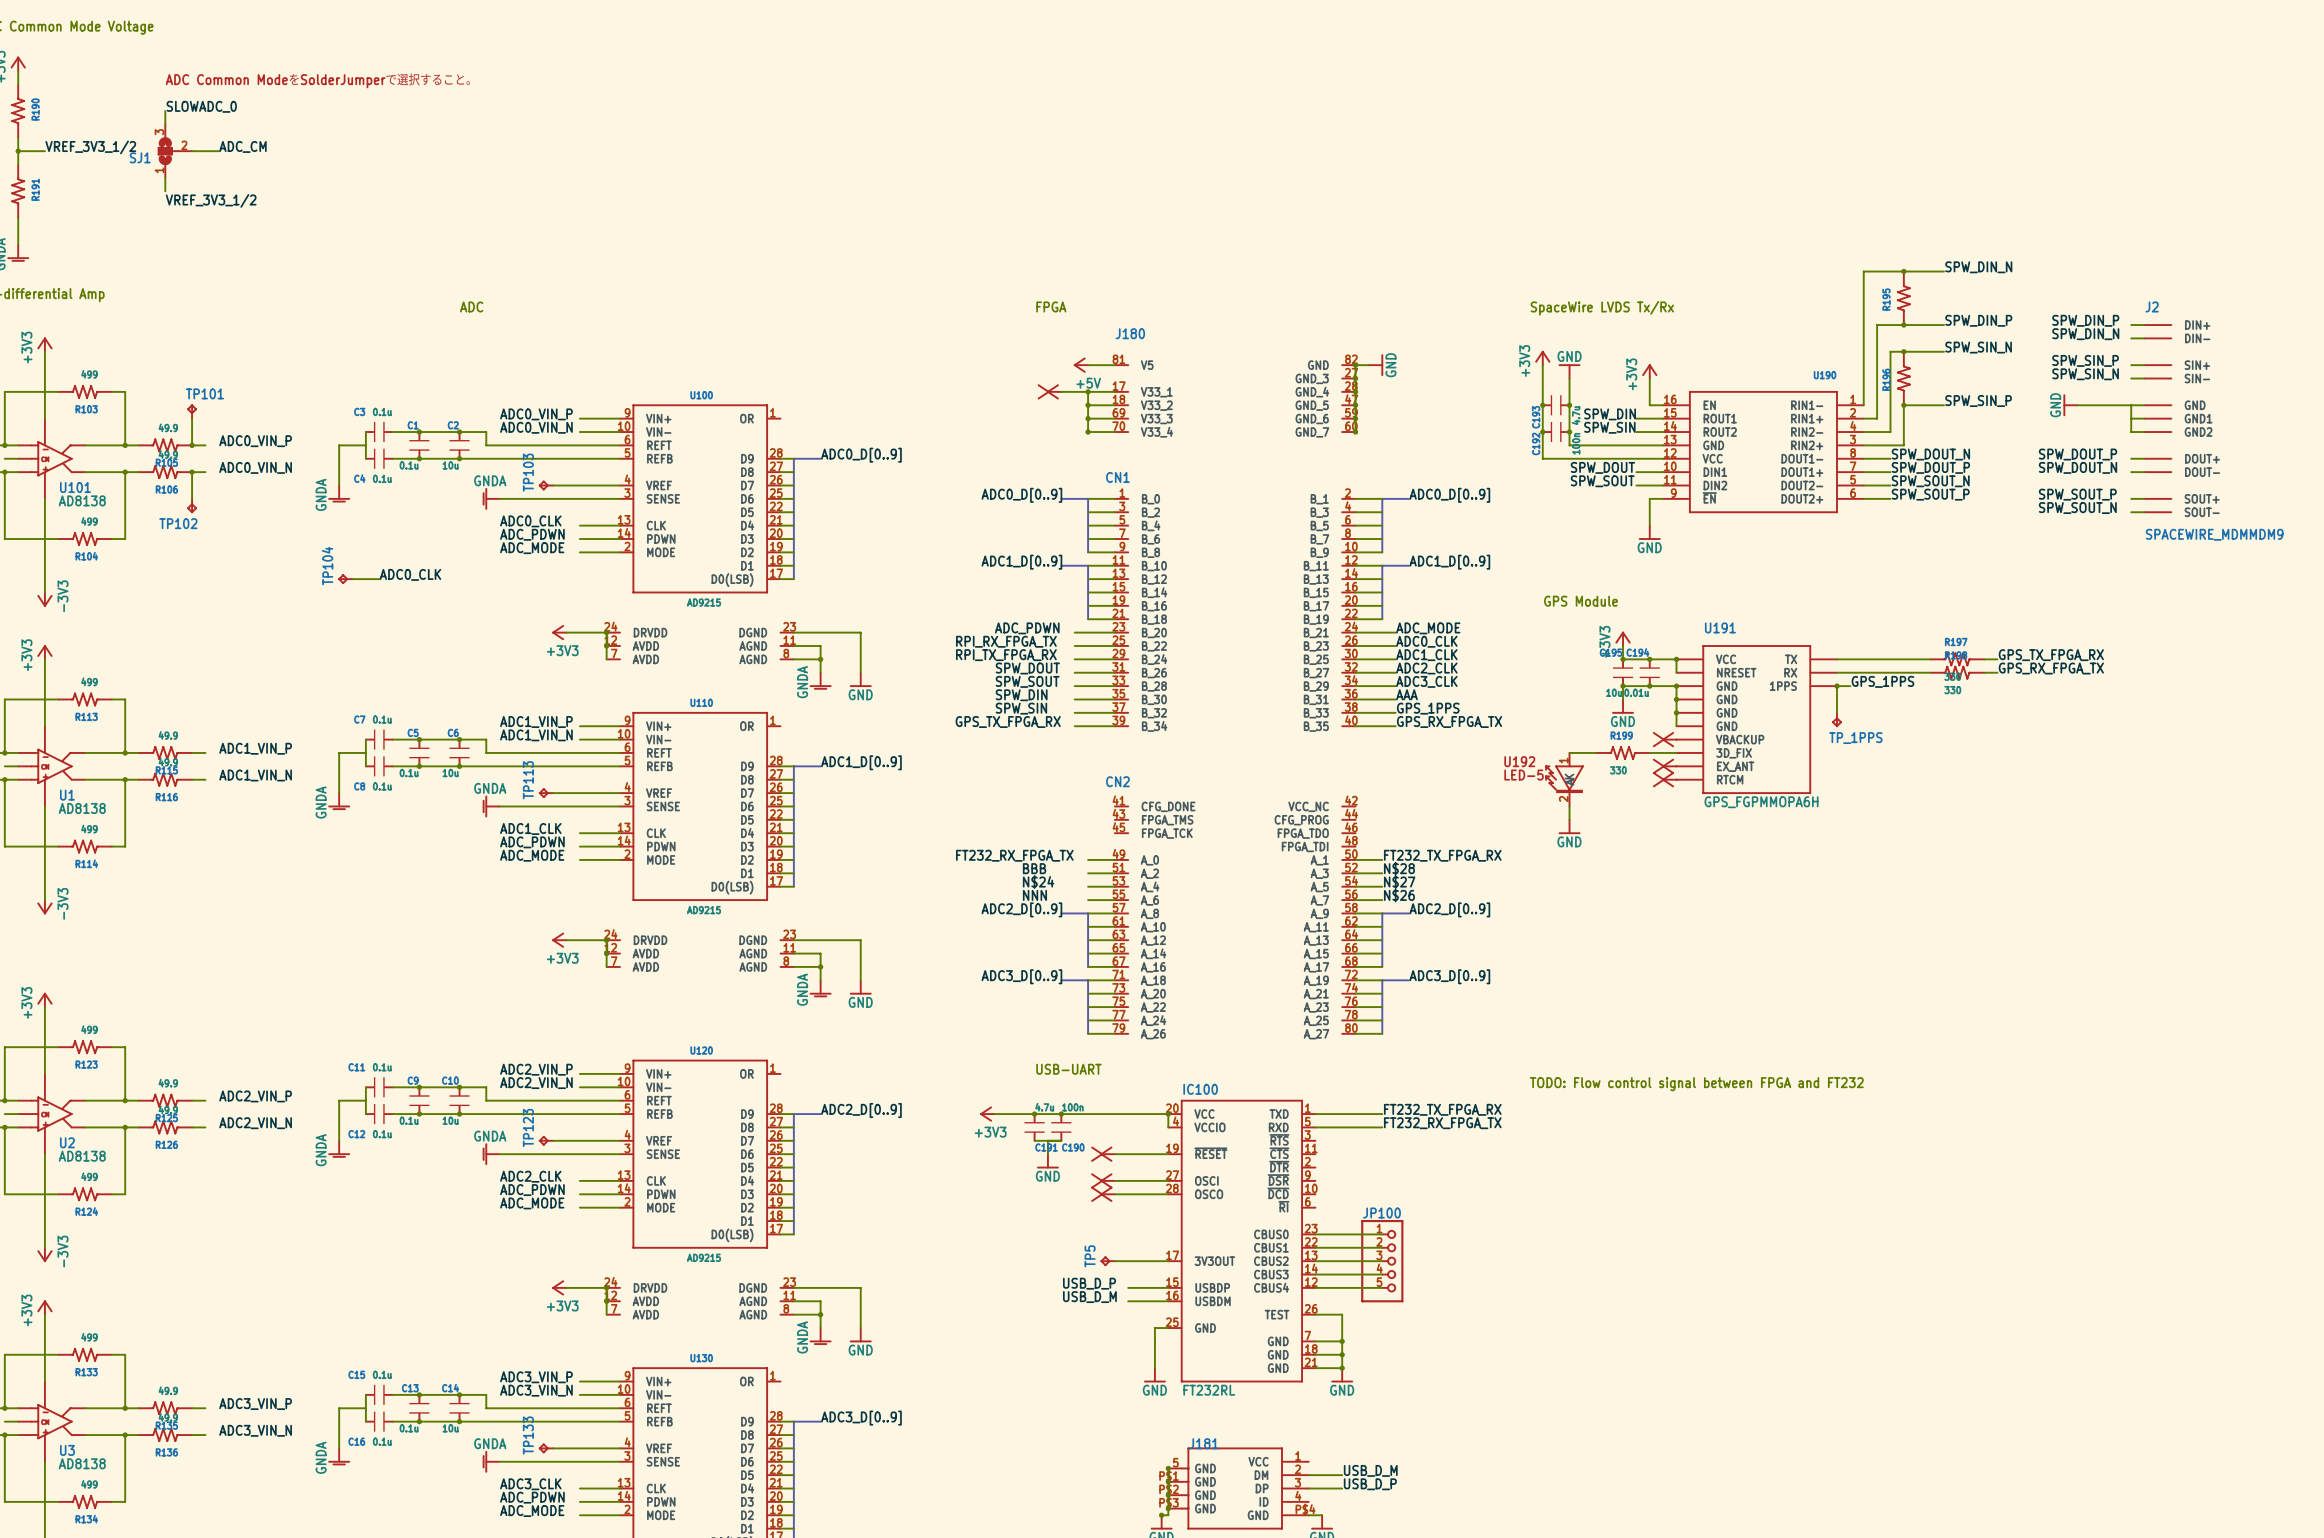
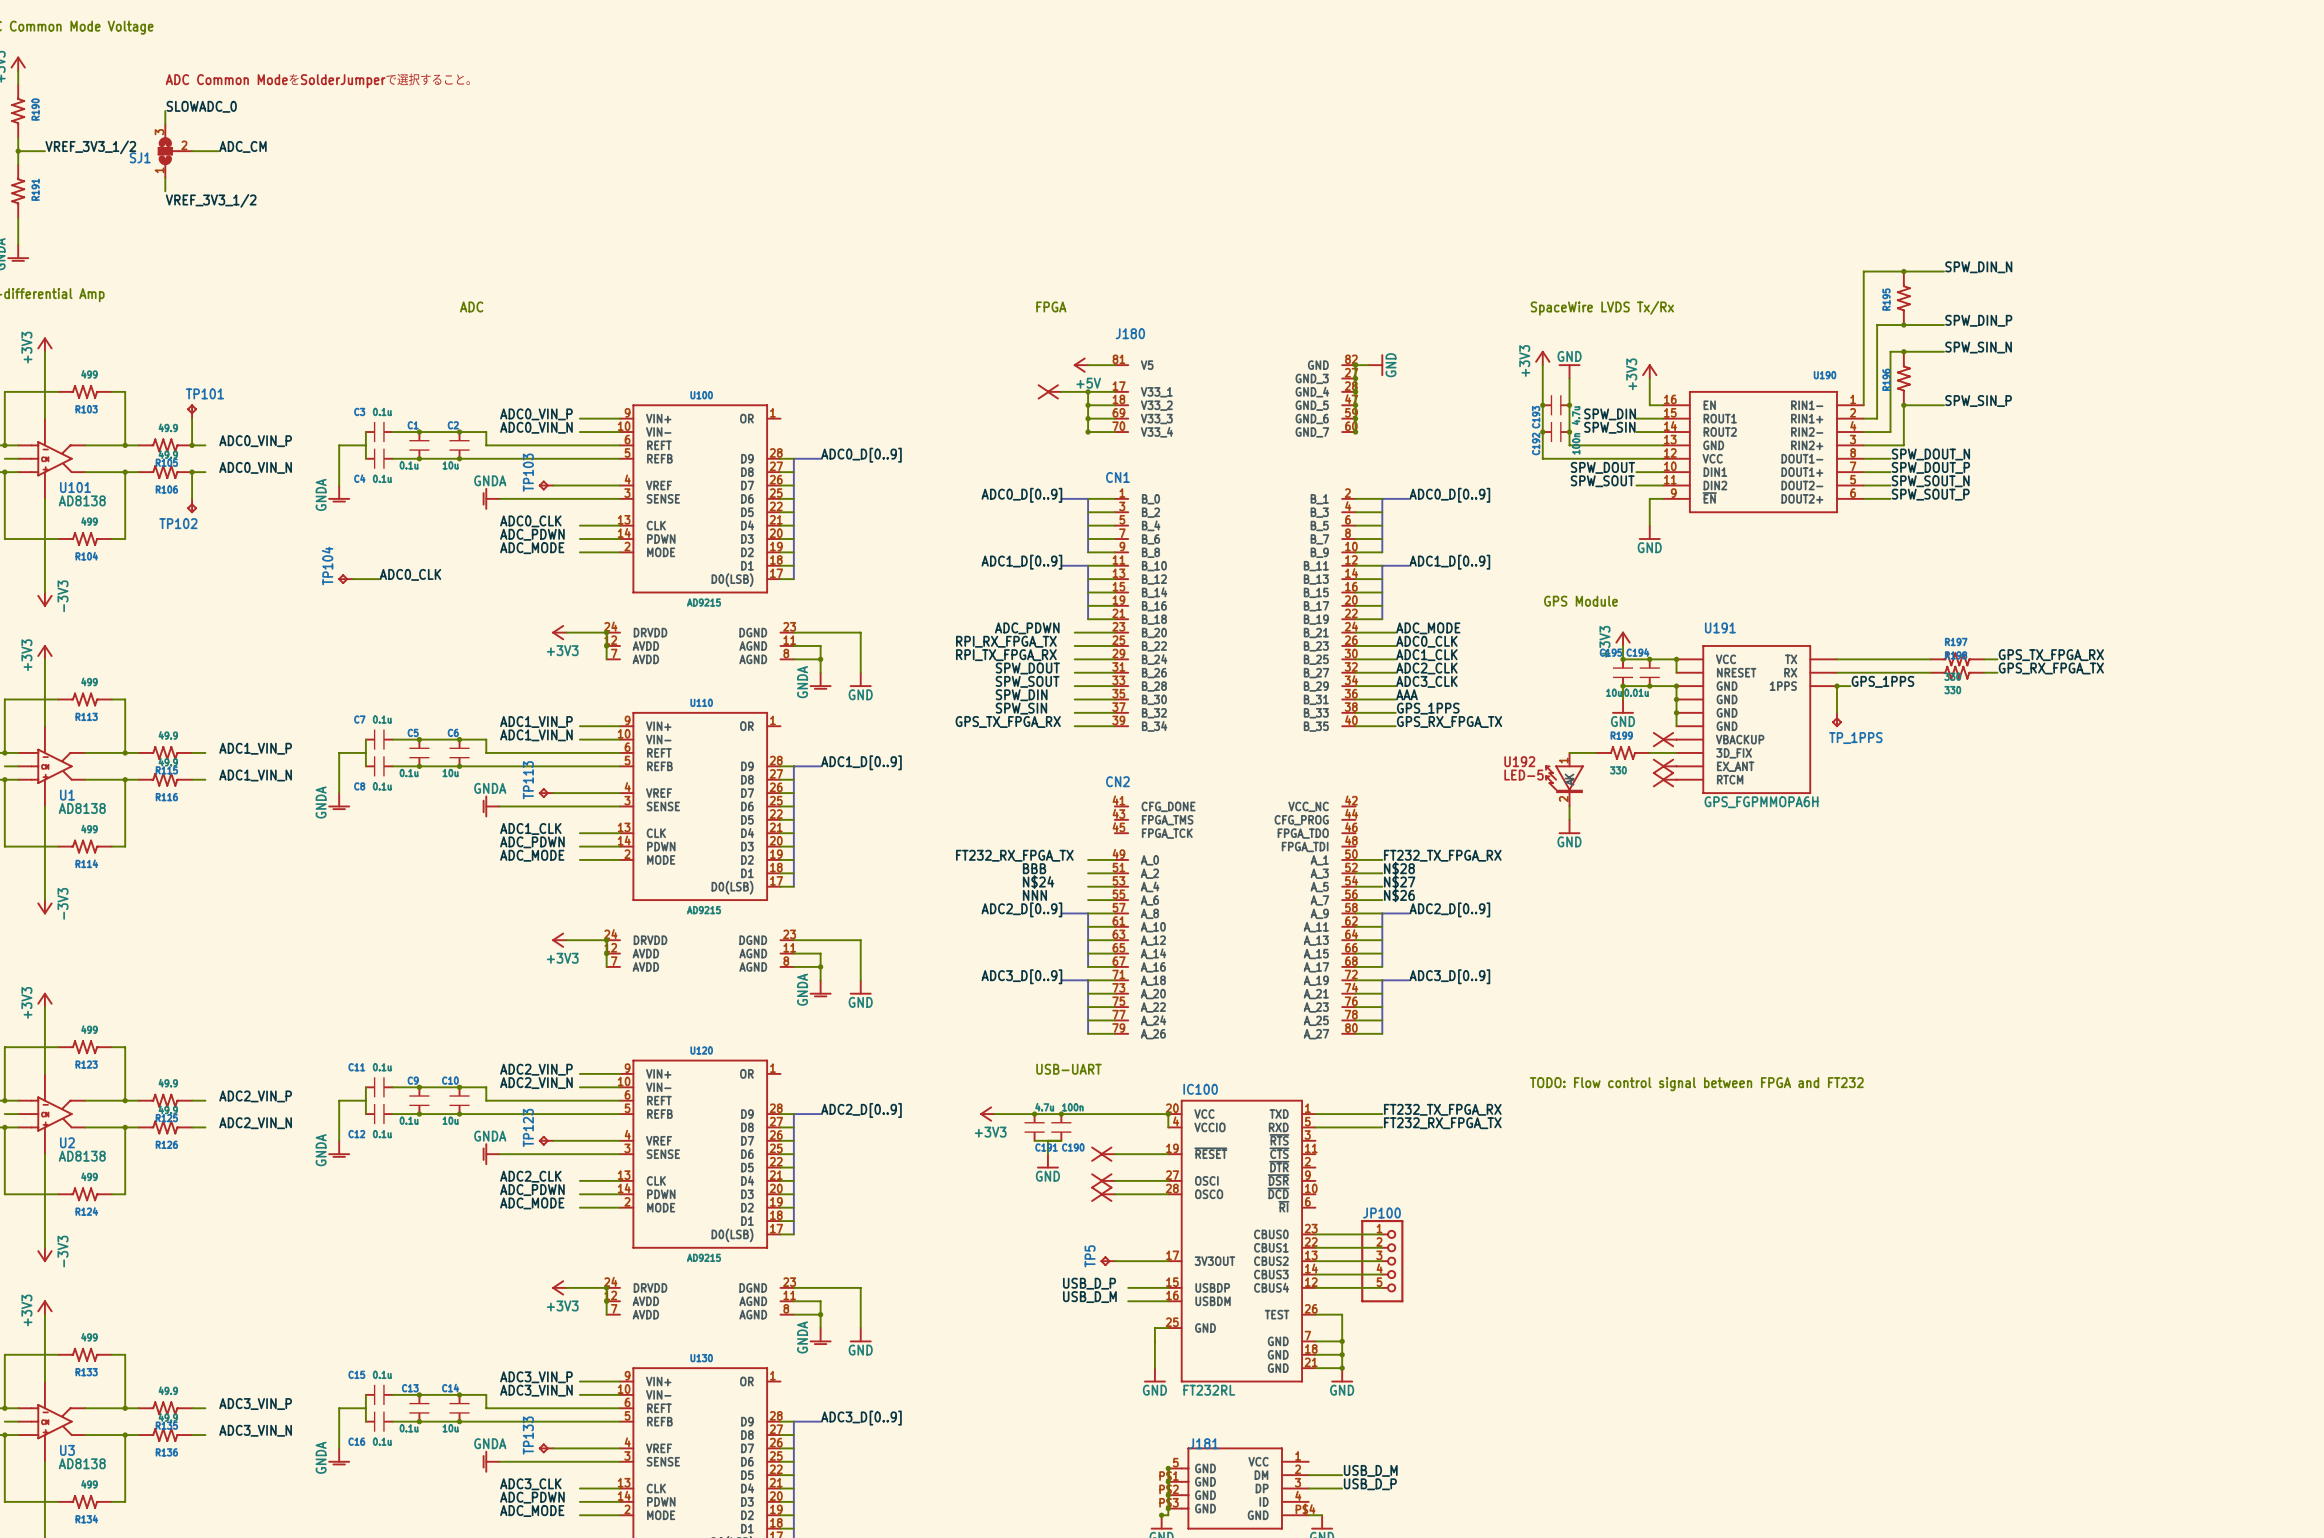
label: SPW_DIN_P (2085, 320) -> none
wire: (2131, 325) (2144, 325) -> none
label: SPW_DIN_N (2085, 334) -> none
wire: (2131, 338) (2144, 338) -> none
label: SPW_SIN_P (2085, 360) -> none
wire: (2131, 365) (2144, 365) -> none
label: SPW_SIN_N (2085, 374) -> none
wire: (2131, 378) (2144, 378) -> none
power symbol: GND (2070, 405) -> none
wire: (2077, 405) (2144, 405) -> none
wire: (2131, 405) (2131, 432) (2144, 432) -> none
wire: (2131, 418) (2144, 418) -> none
J2: SPACEWIRE_MDMMDM9 (2157, 418) -> none
label: SPW_DOUT_P (2078, 454) -> none
wire: (2131, 458) (2144, 458) -> none
label: SPW_DOUT_N (2078, 467) -> none
wire: (2131, 472) (2144, 472) -> none
label: SPW_SOUT_P (2077, 494) -> none
wire: (2131, 498) (2144, 498) -> none
label: SPW_SOUT_N (2077, 508) -> none
wire: (2131, 512) (2144, 512) -> none

